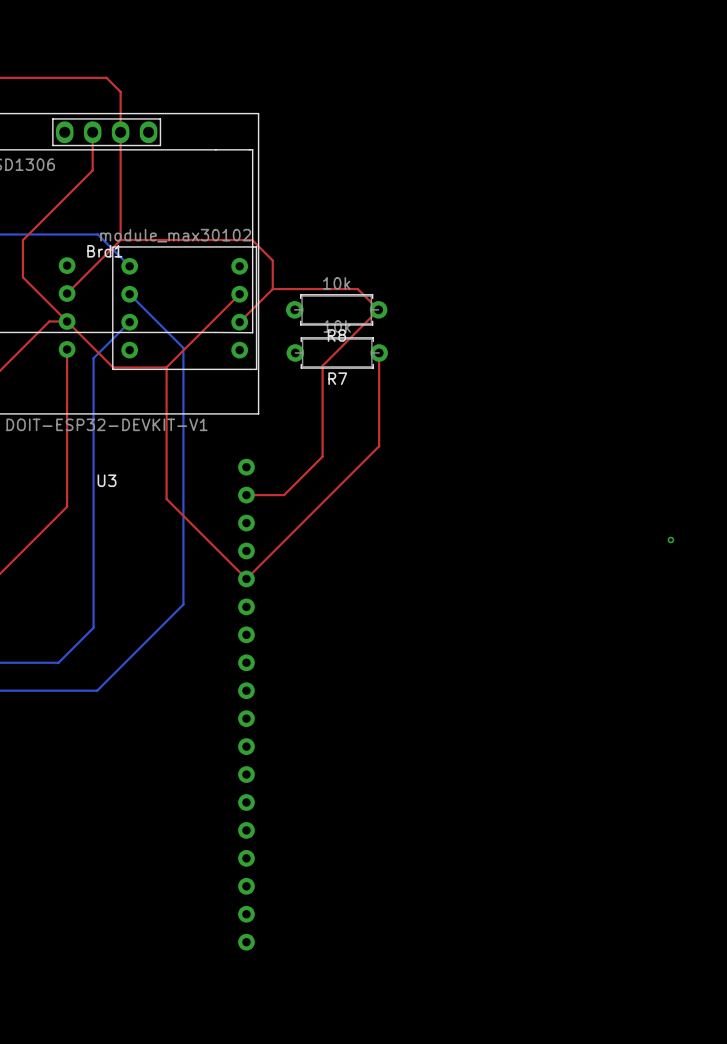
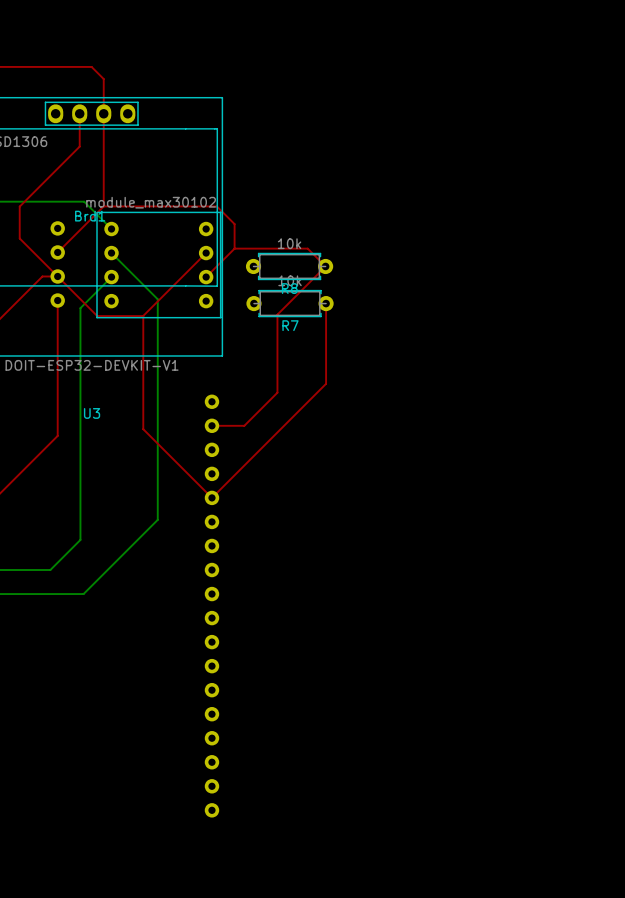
via: (670, 539) -> none

